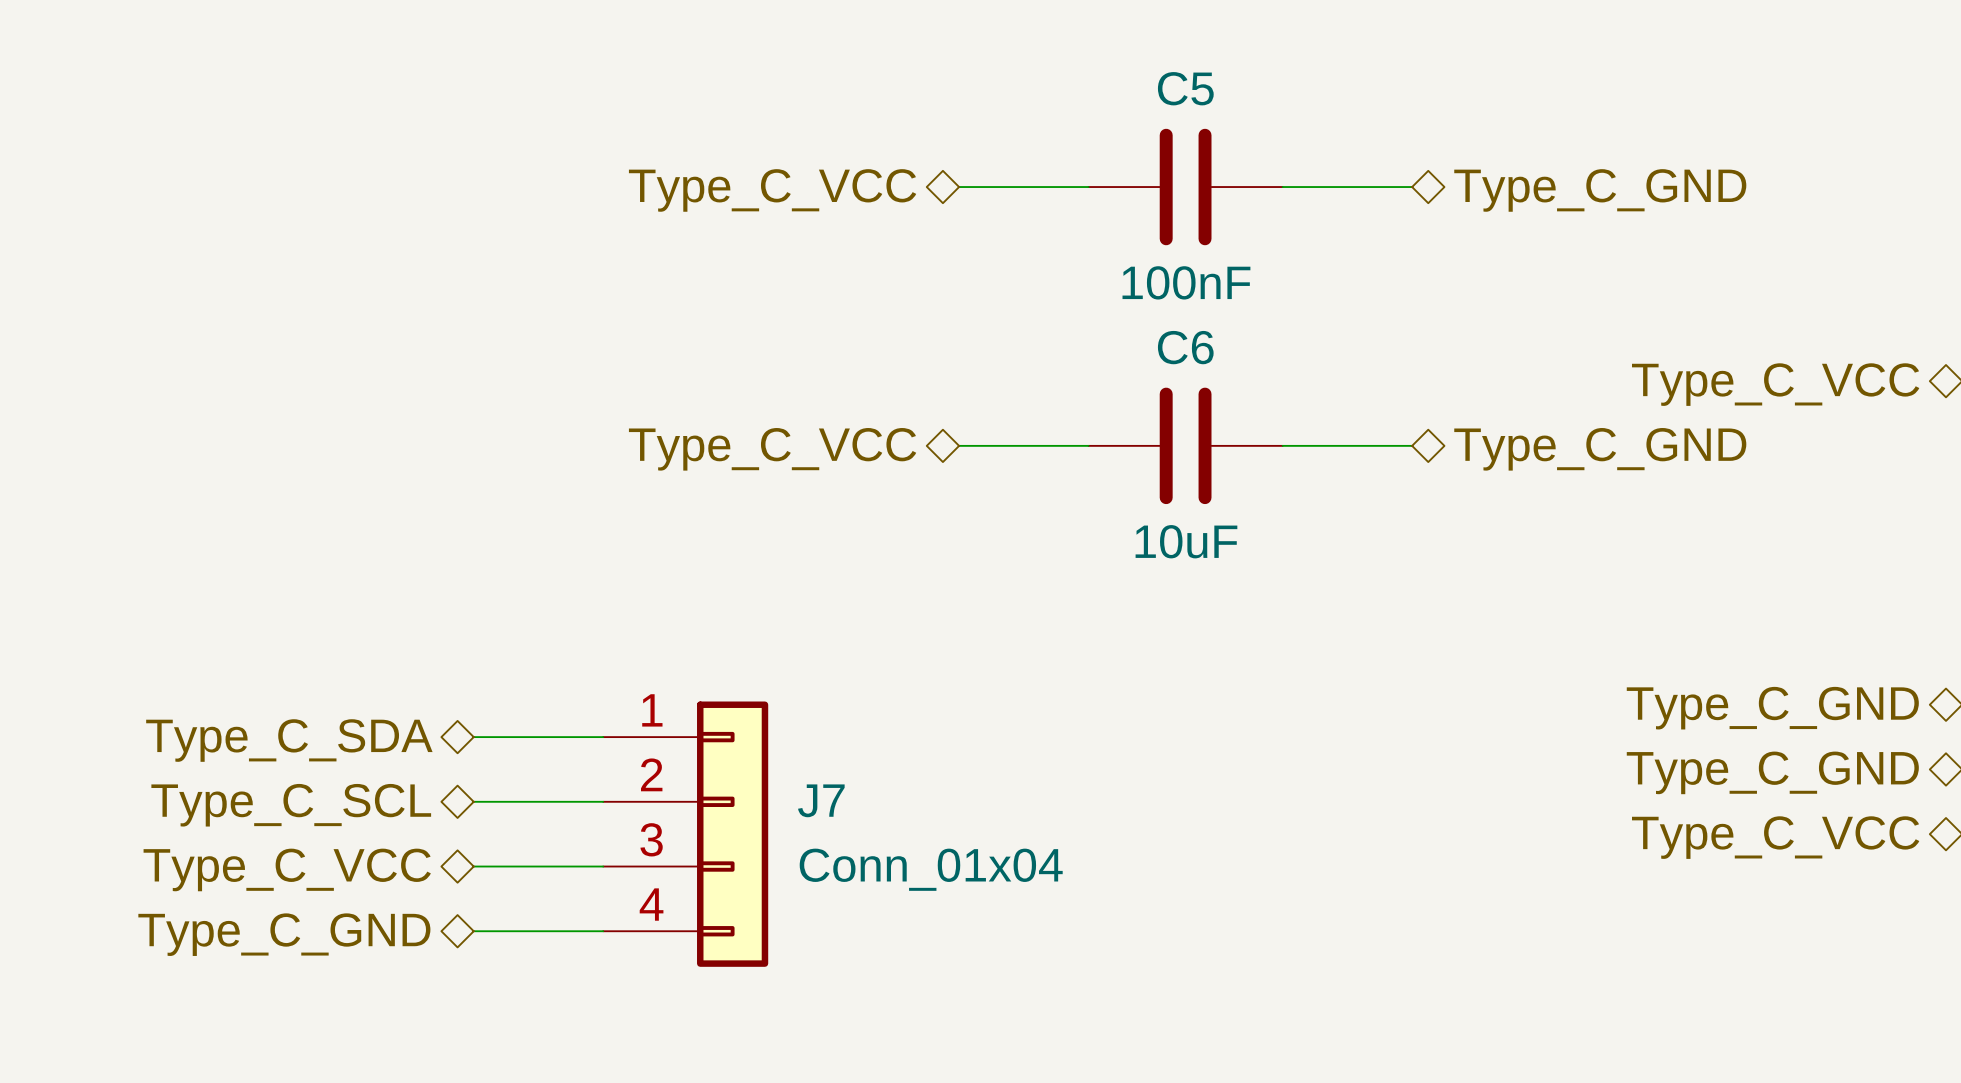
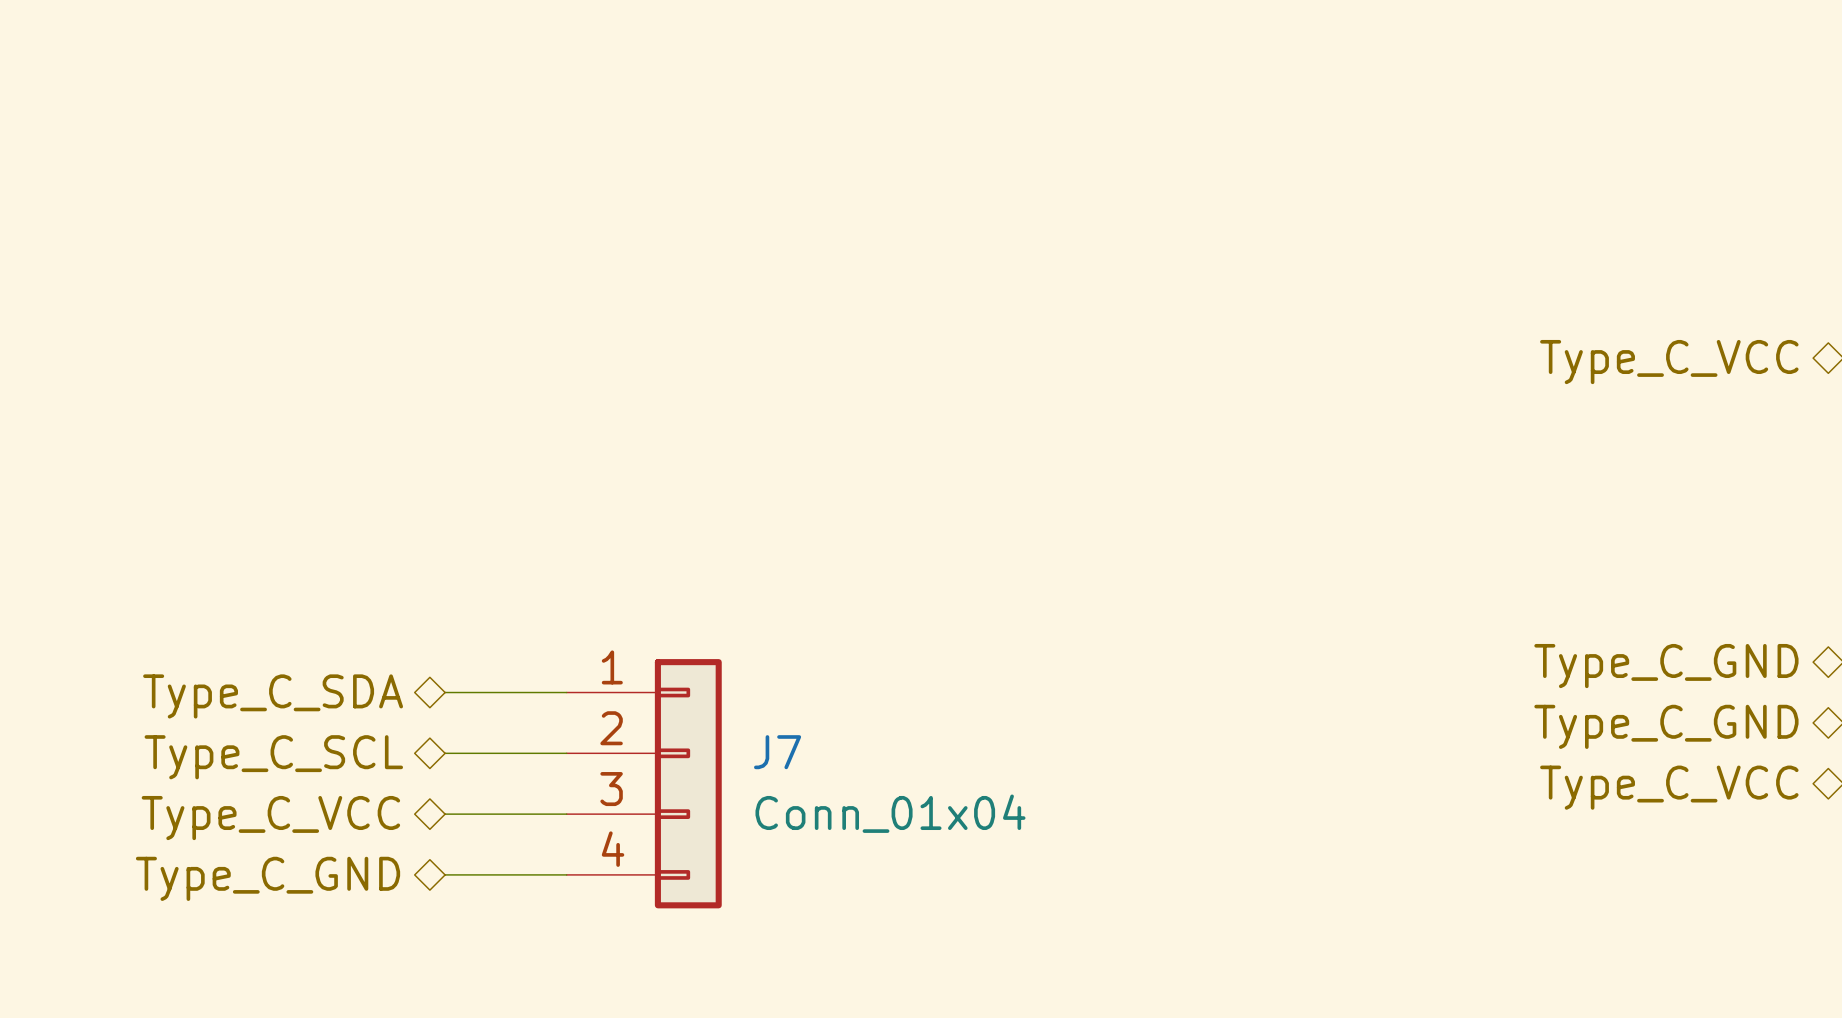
wire: (959, 187) (1088, 187) -> none
C5: 100nF (1185, 187) -> none
wire: (1282, 187) (1412, 187) -> none
hierarchical label: Type_C_VCC (772, 190) -> none
hierarchical label: Type_C_GND (1600, 190) -> none
wire: (959, 445) (1088, 445) -> none
C6: 10uF (1185, 445) -> none
wire: (1282, 445) (1412, 445) -> none
hierarchical label: Type_C_VCC (772, 449) -> none
hierarchical label: Type_C_GND (1600, 449) -> none

